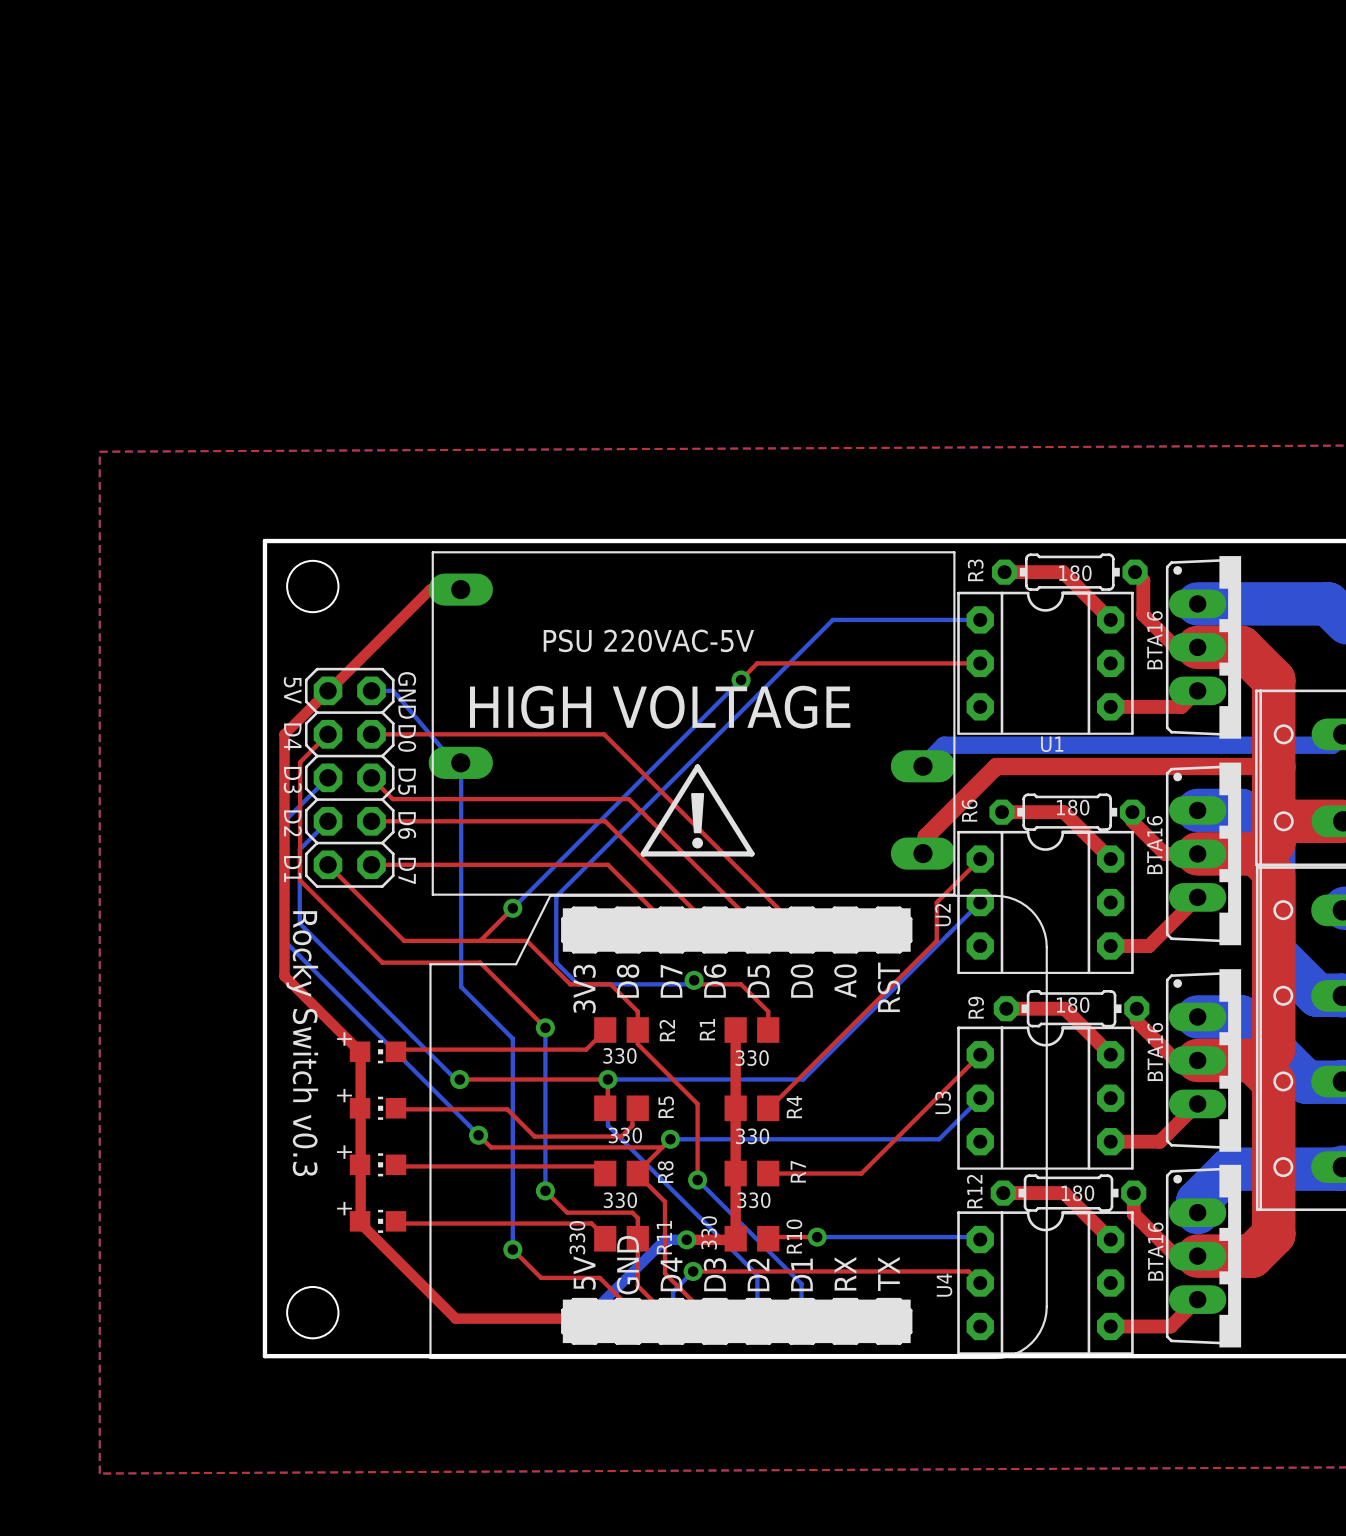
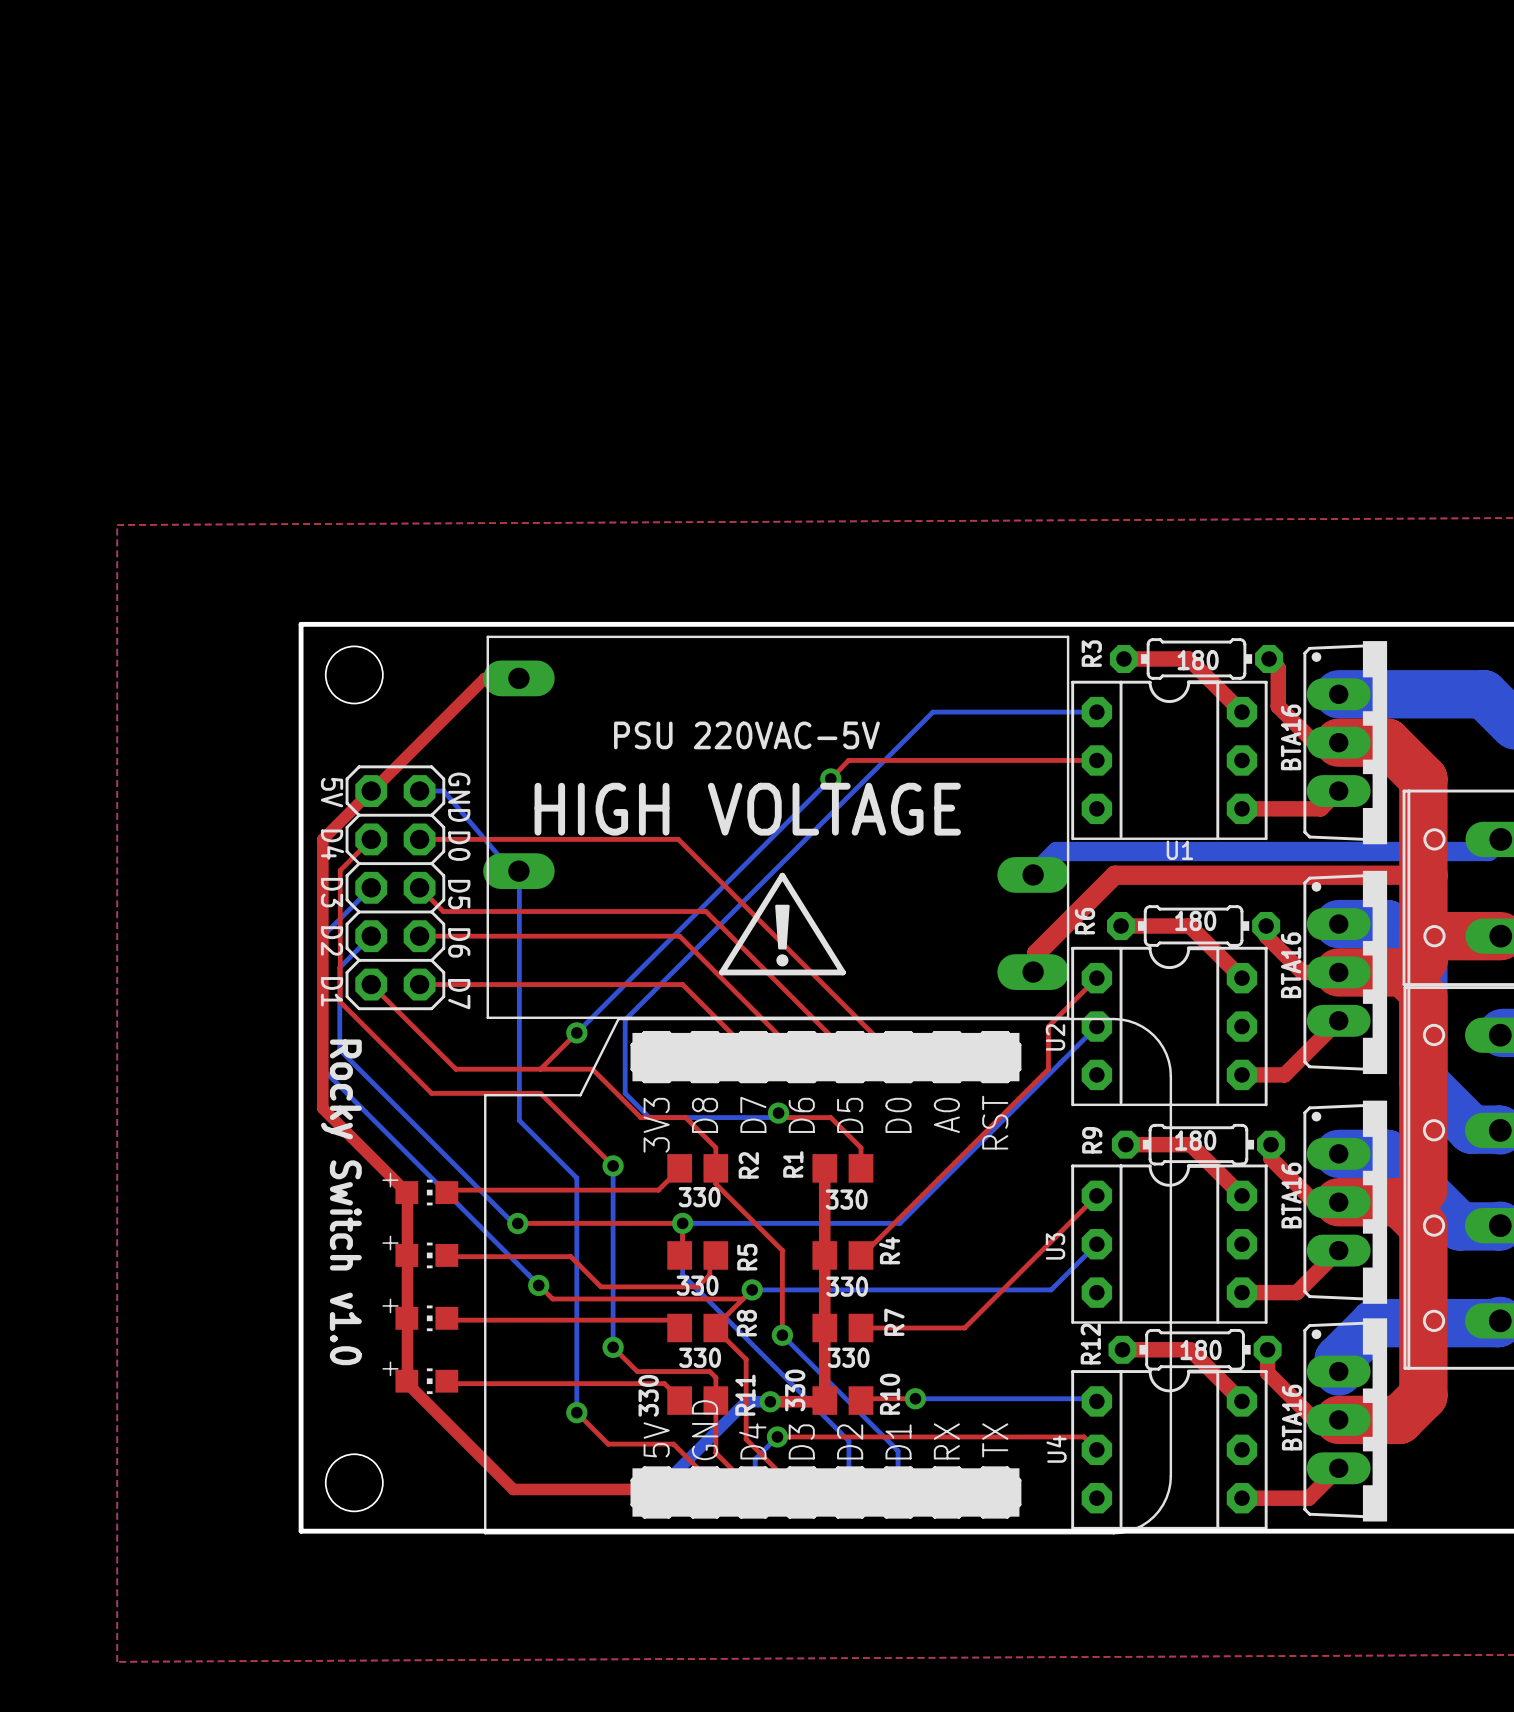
text: Rocky Switch v0.3 (302, 1043) -> Rocky Switch v1.0 (341, 1202)

